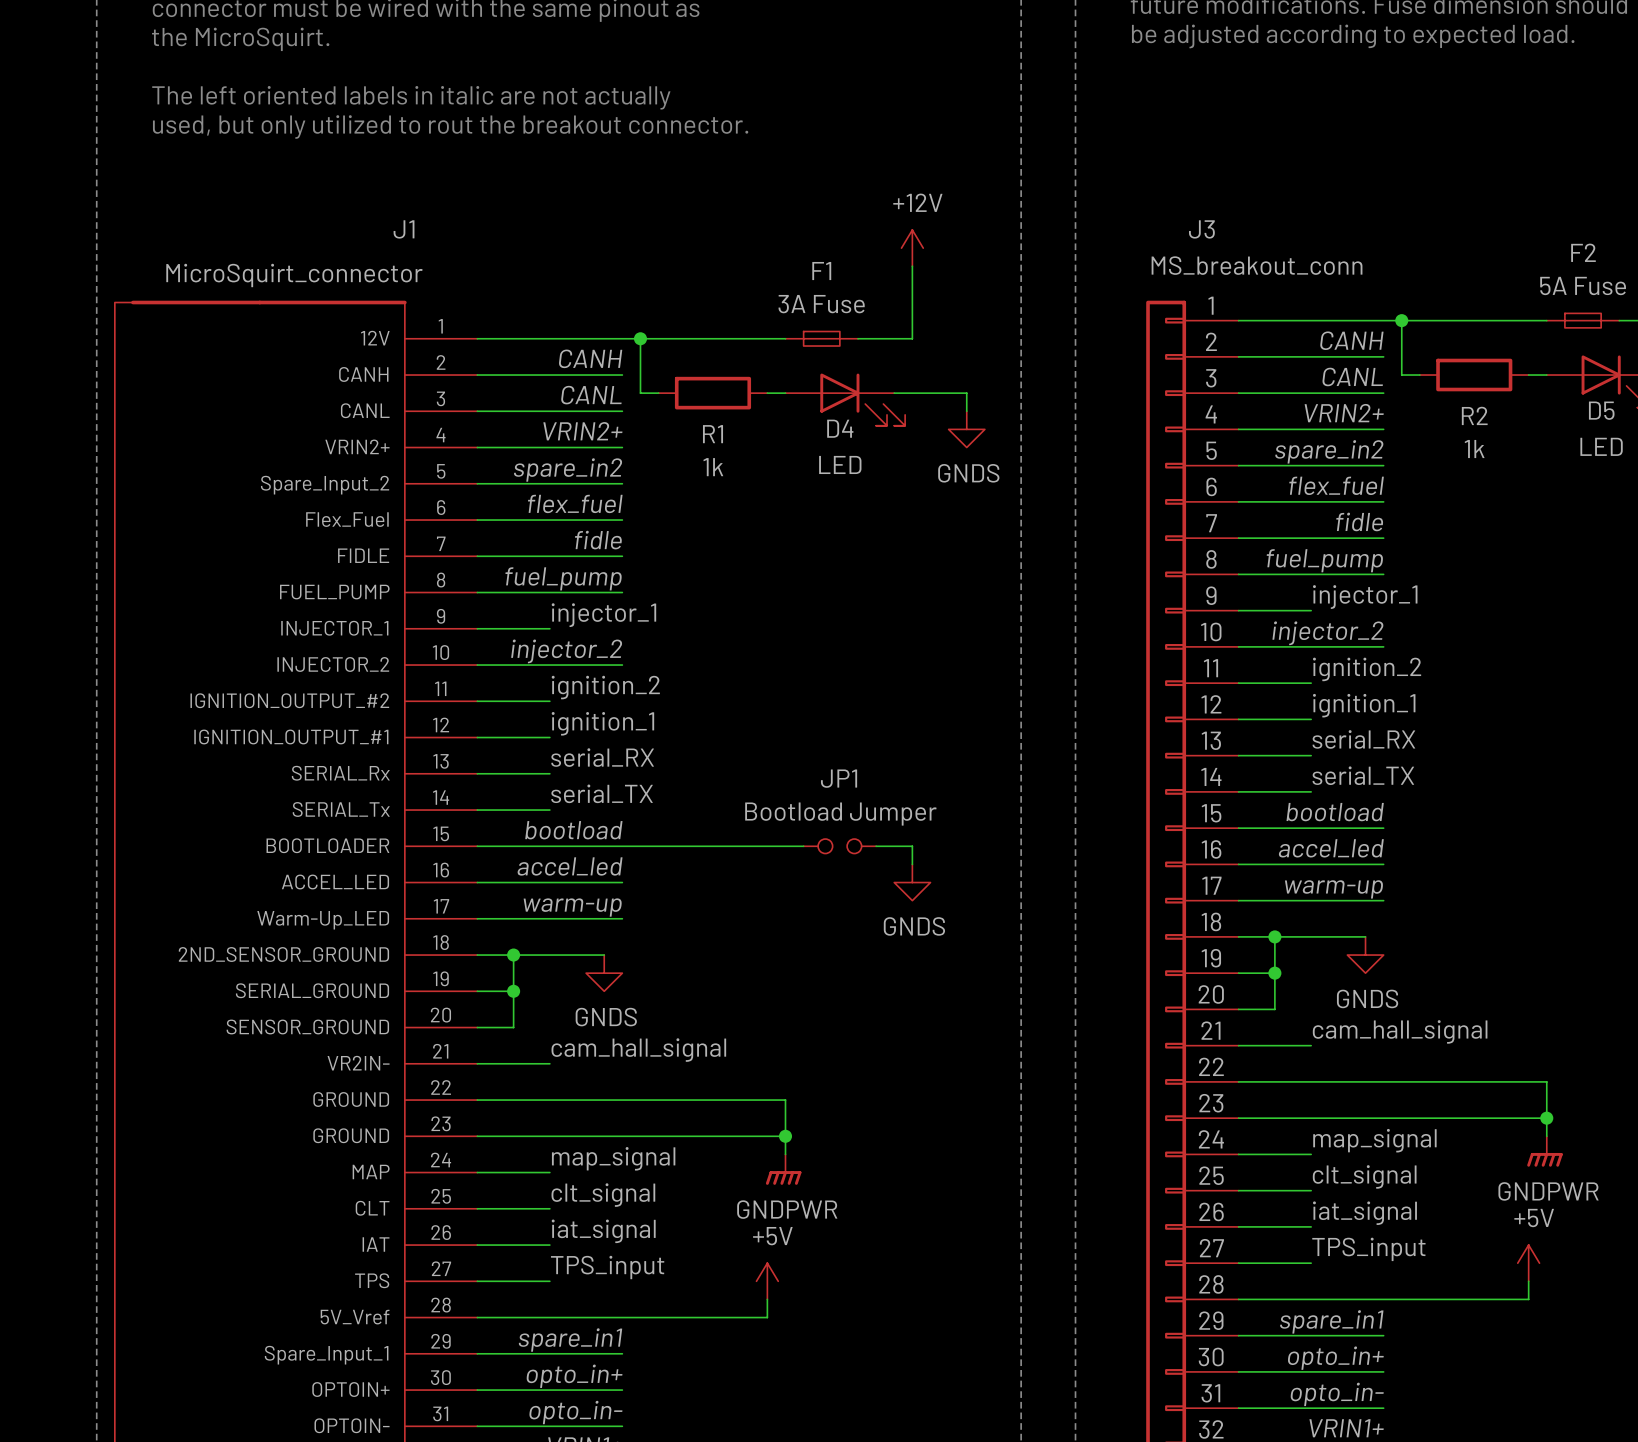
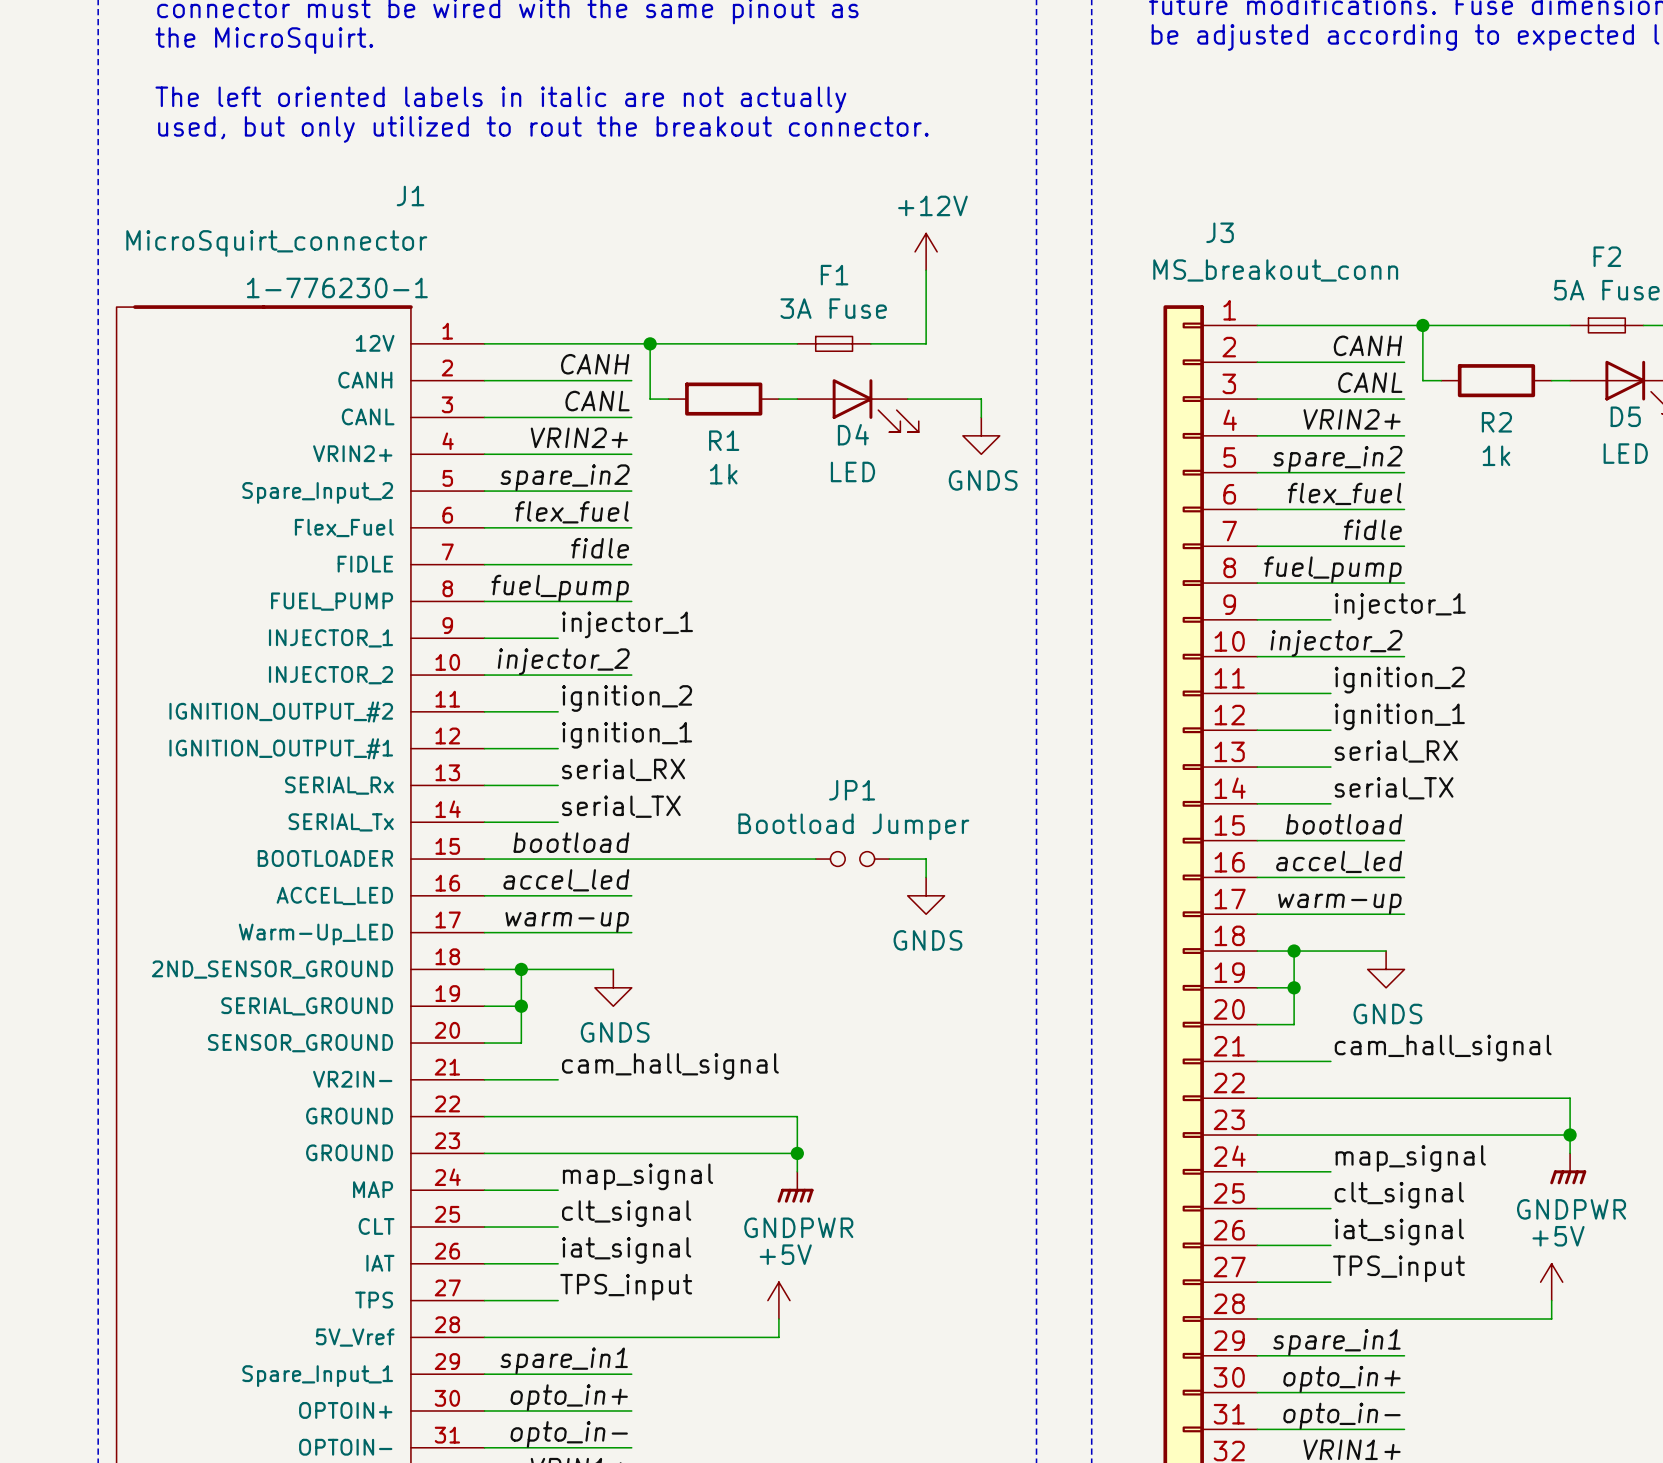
J1 name position: J1 (404, 229) -> J1 (410, 195)
J1 value position: MicroSquirt_connector (294, 275) -> MicroSquirt_connector (276, 243)
J1 text: none -> 1-776230-1 (337, 287)

